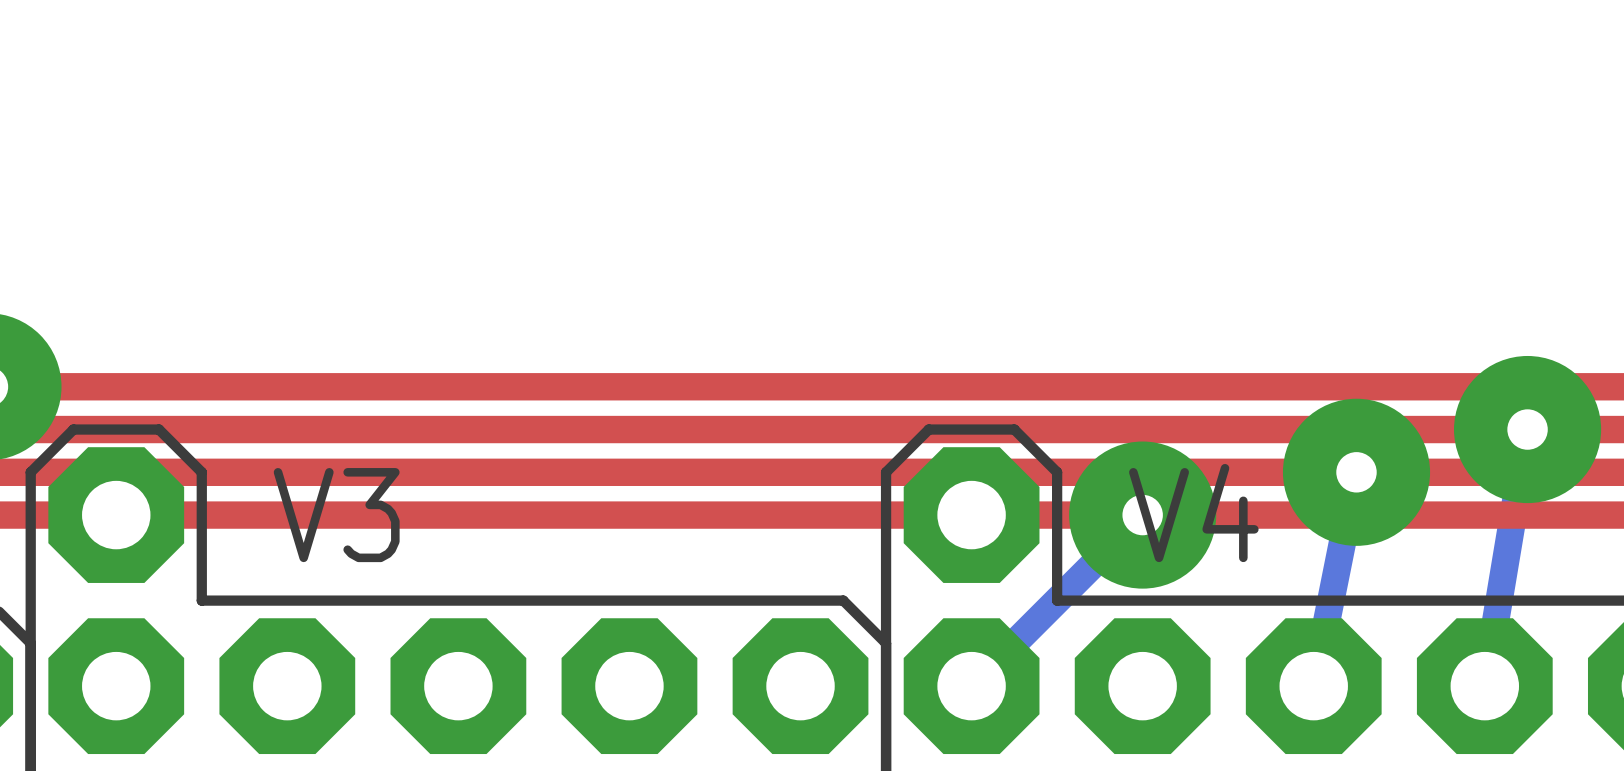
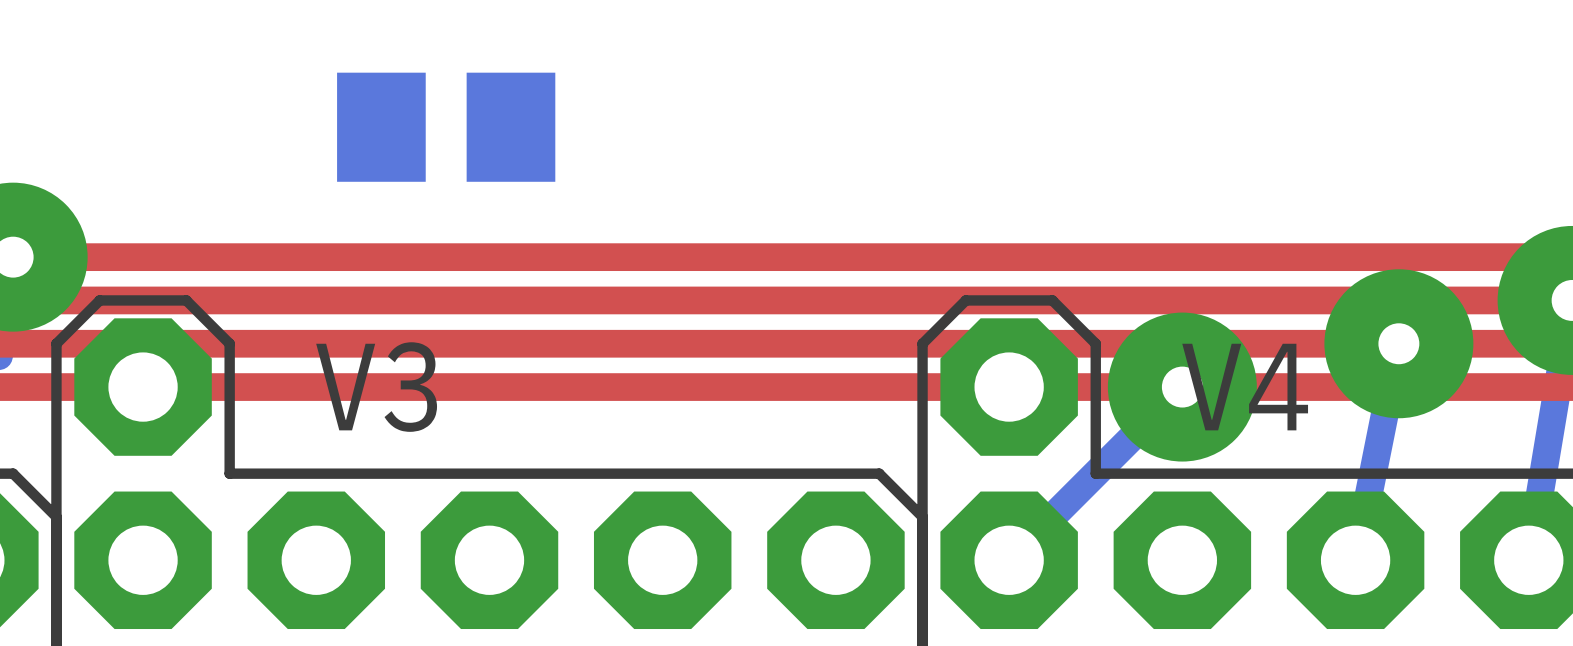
part: none -> (446, 127)

